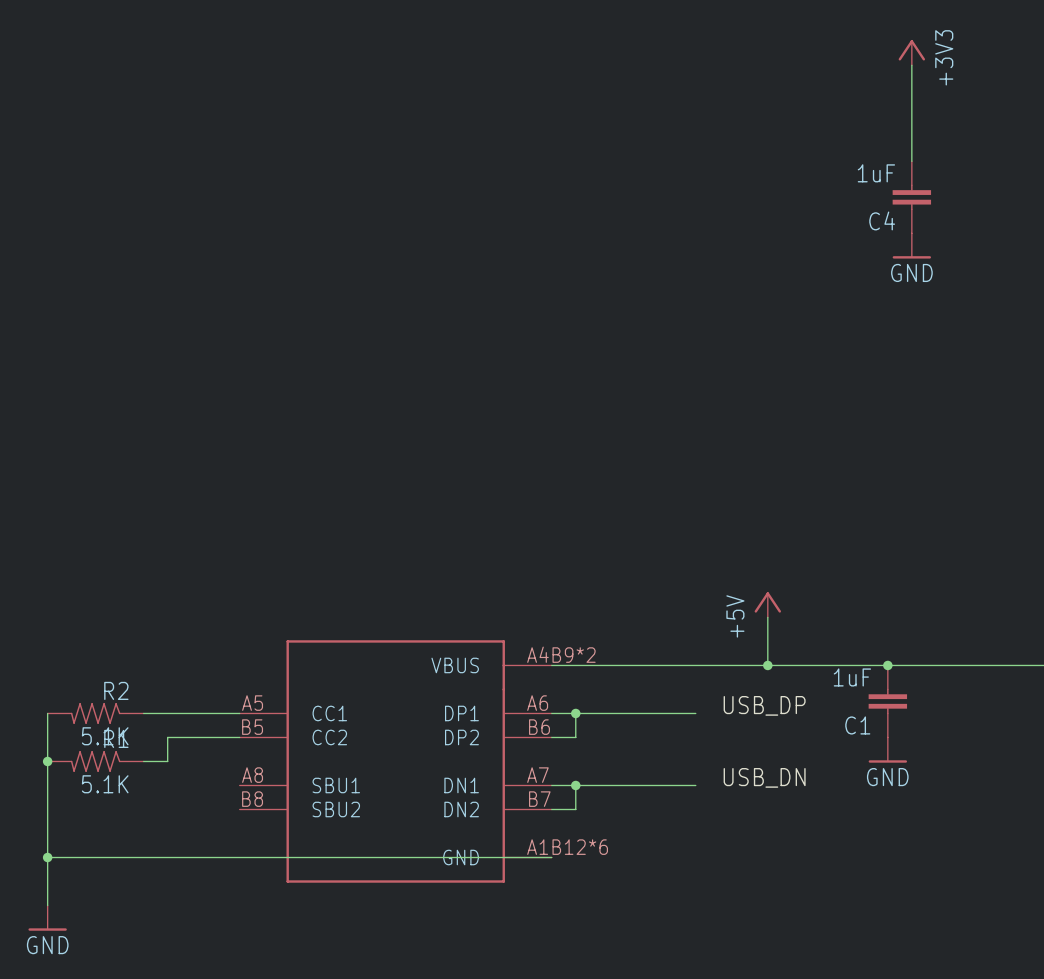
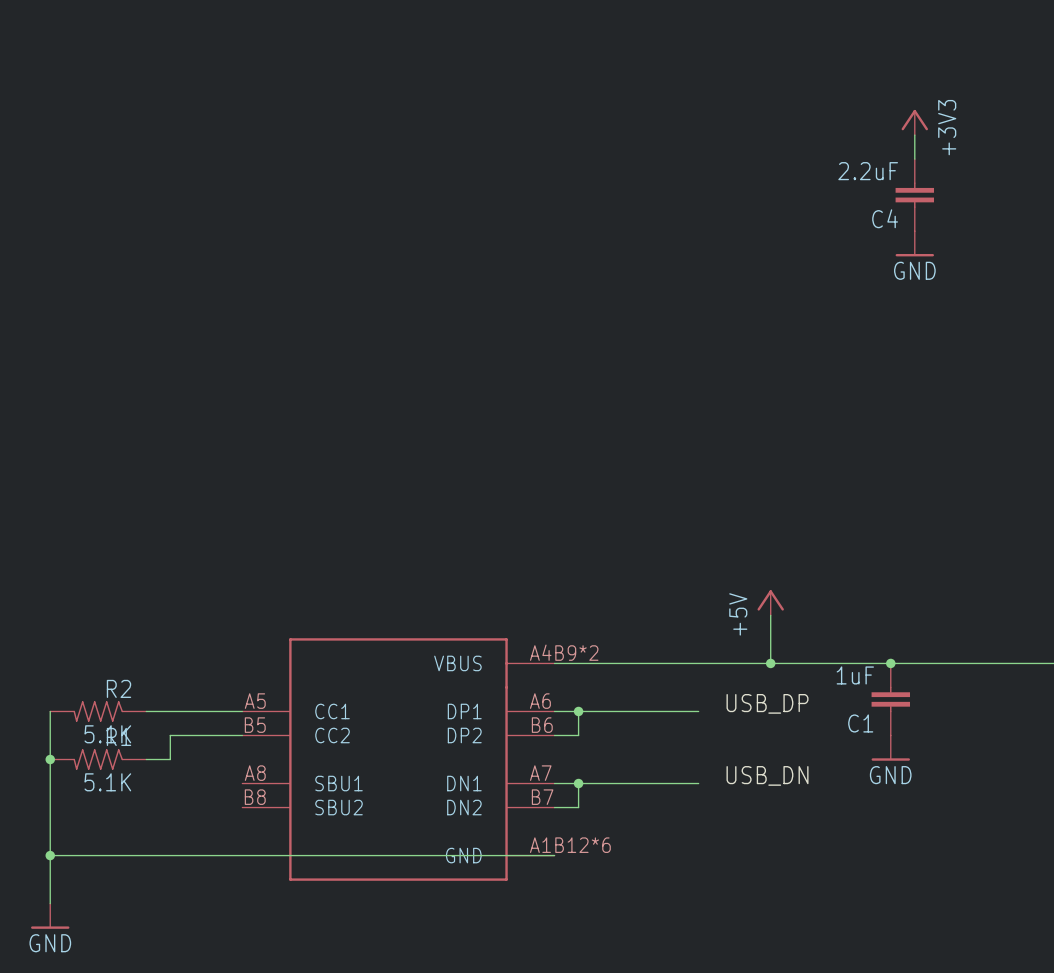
power symbol position: +3V3 (911, 52) -> +3V3 (914, 122)
wire: (911, 65) (911, 137) -> none
C4 value: 1uF (876, 173) -> 2.2uF (868, 171)

